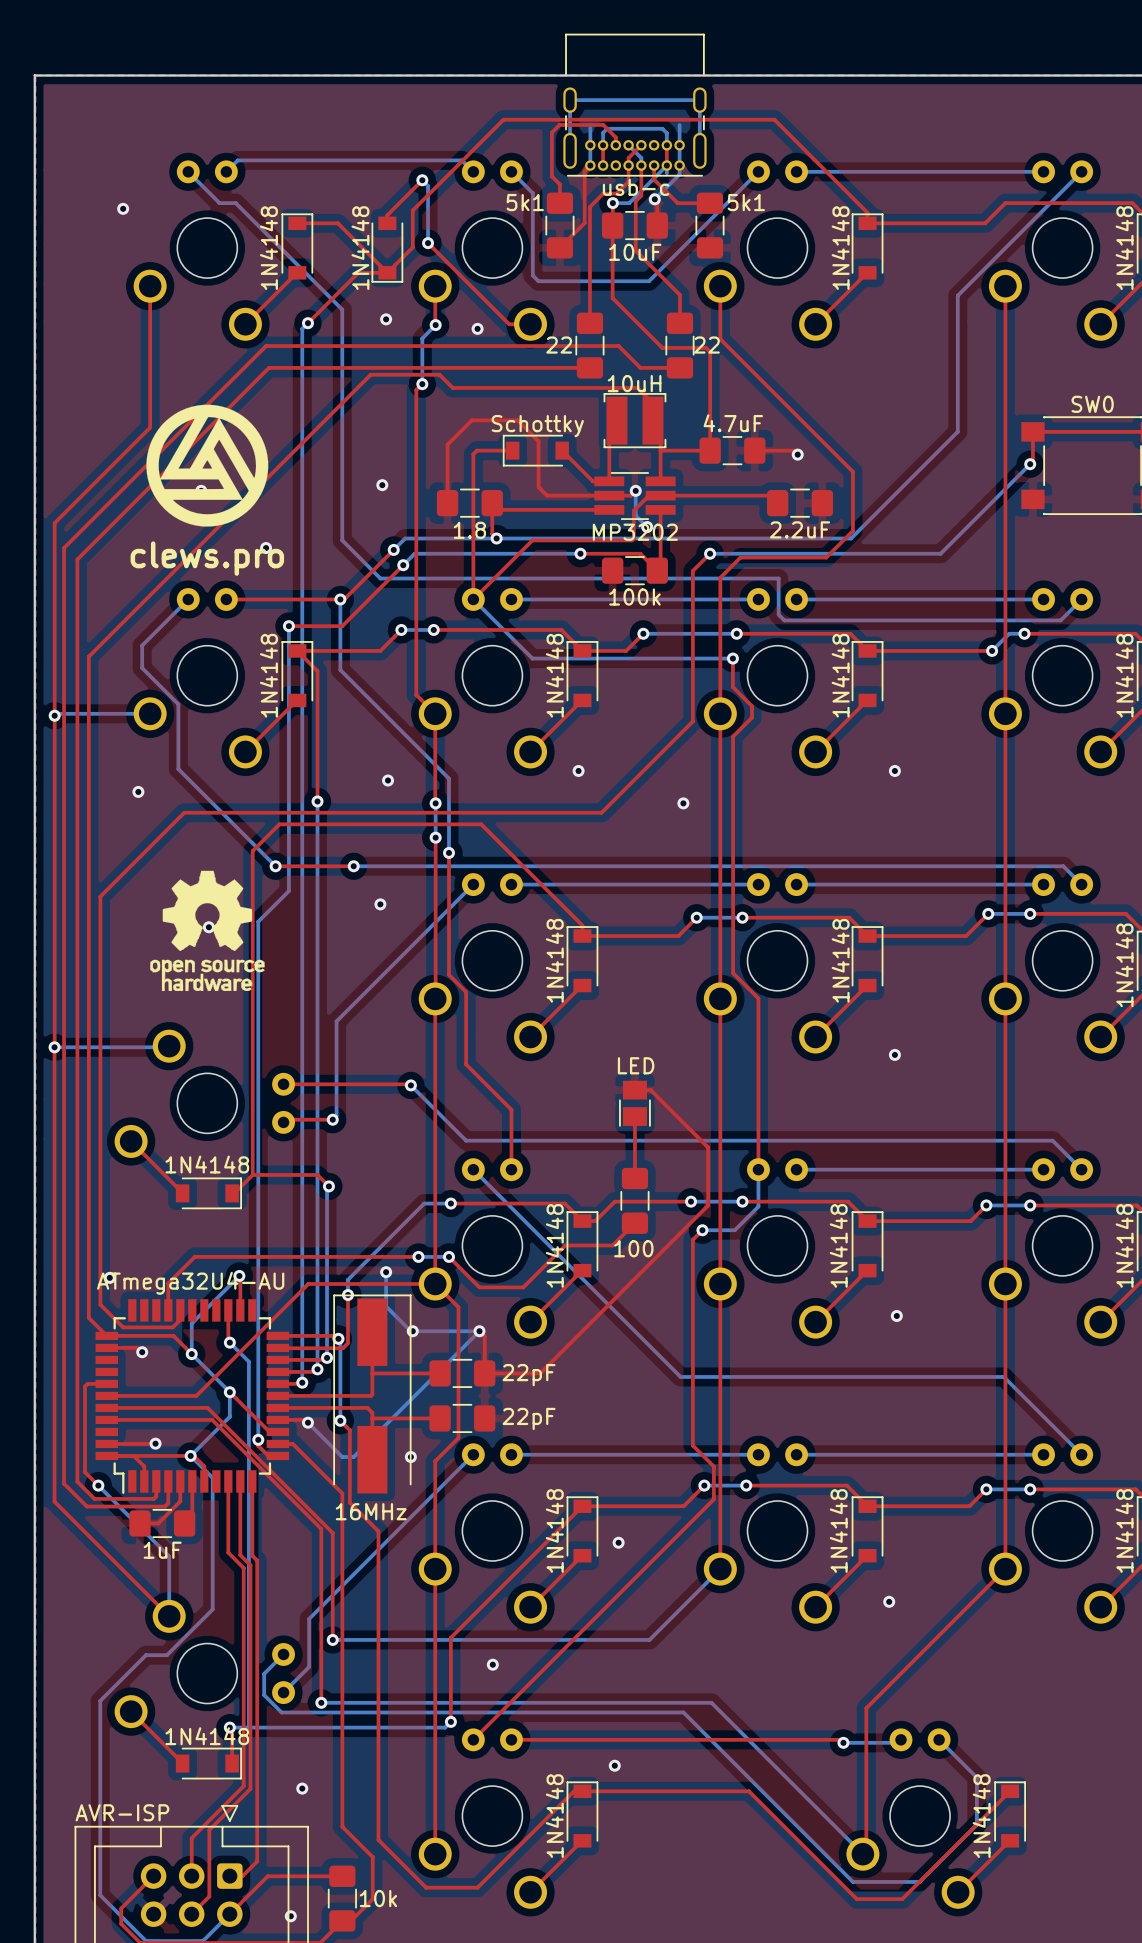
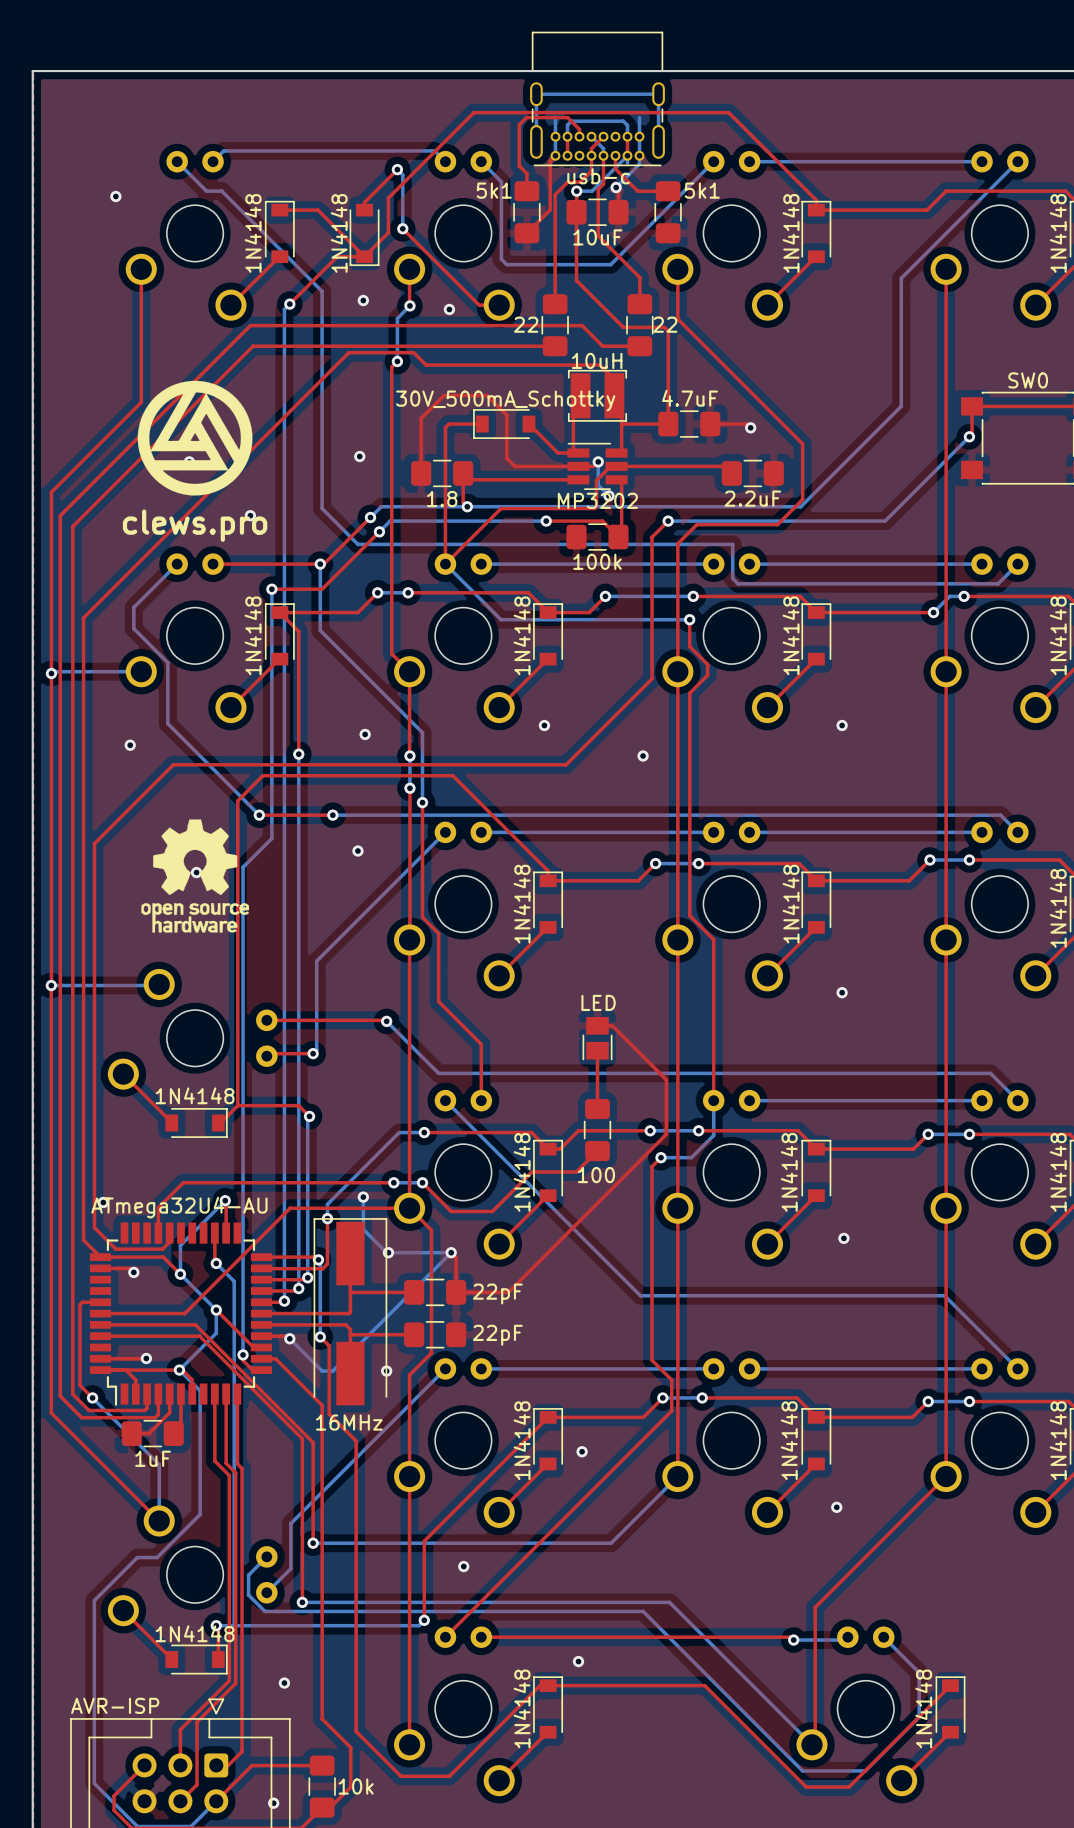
part value: Schottky (537, 426) -> 30V_500mA_Schottky (505, 400)
part footprint: [594, 472, 676, 520] -> [567, 442, 628, 490]

